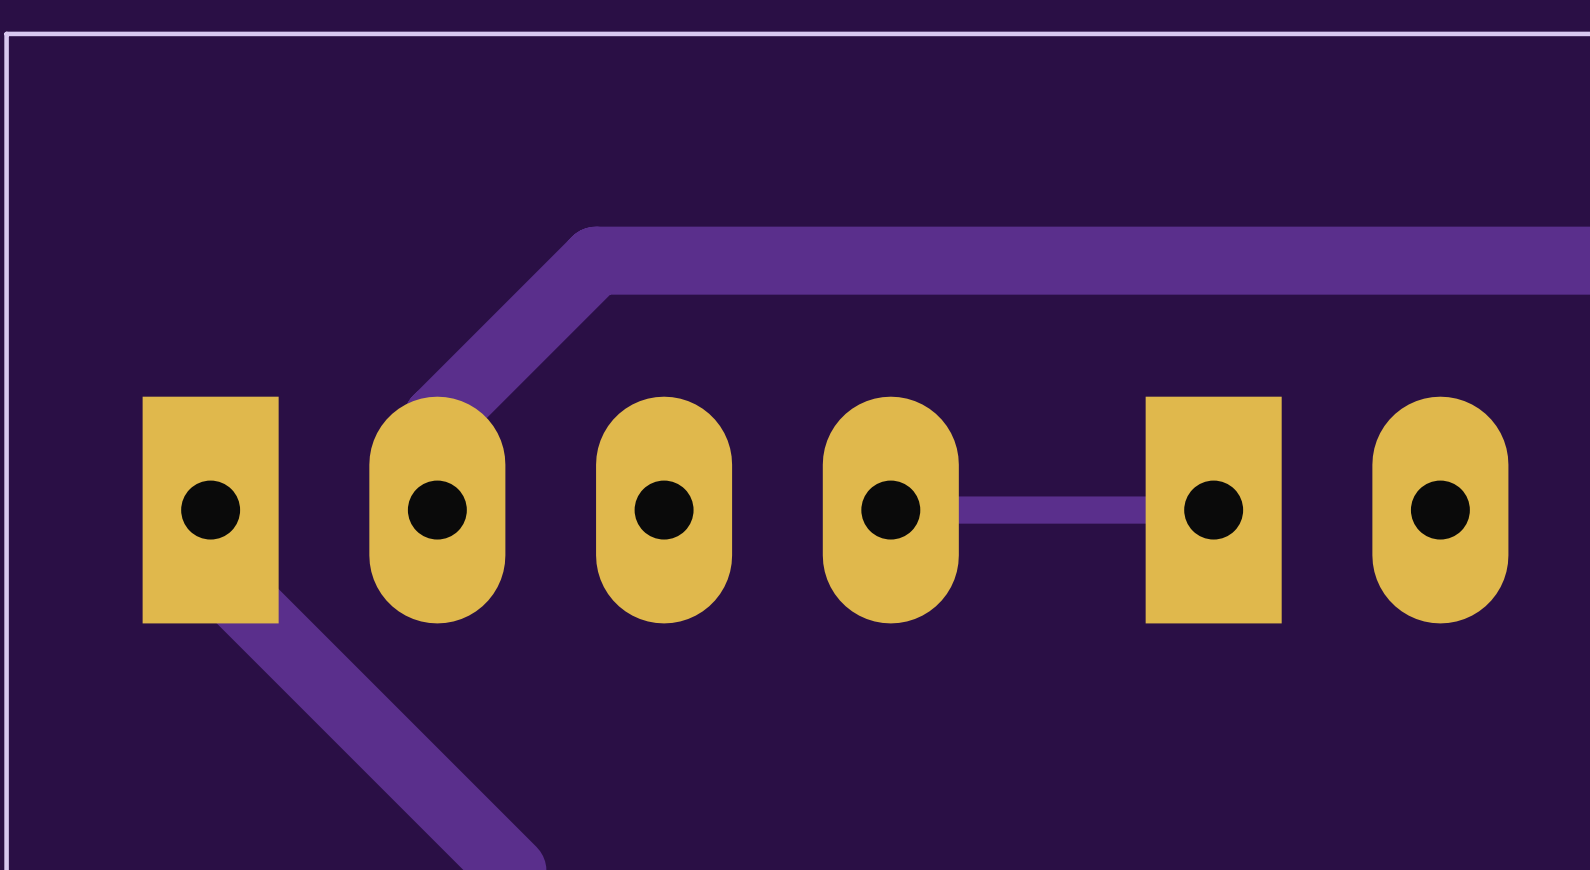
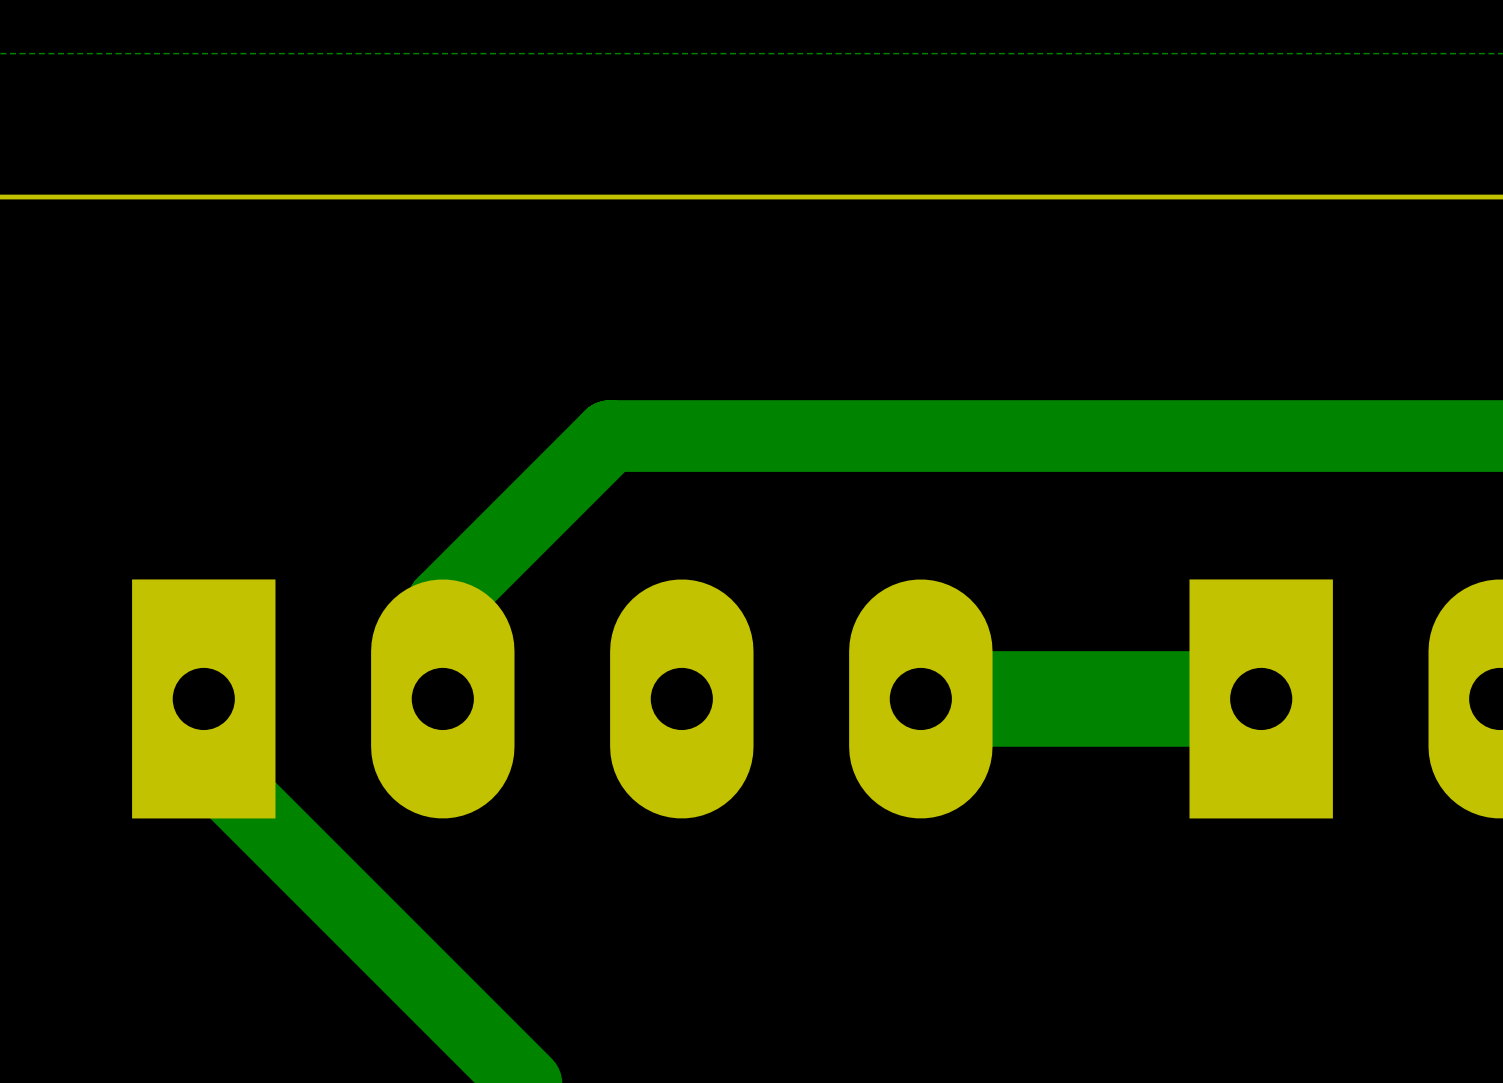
track width: thin (1213, 510) (890, 510) -> thick (1261, 698) (920, 698)

